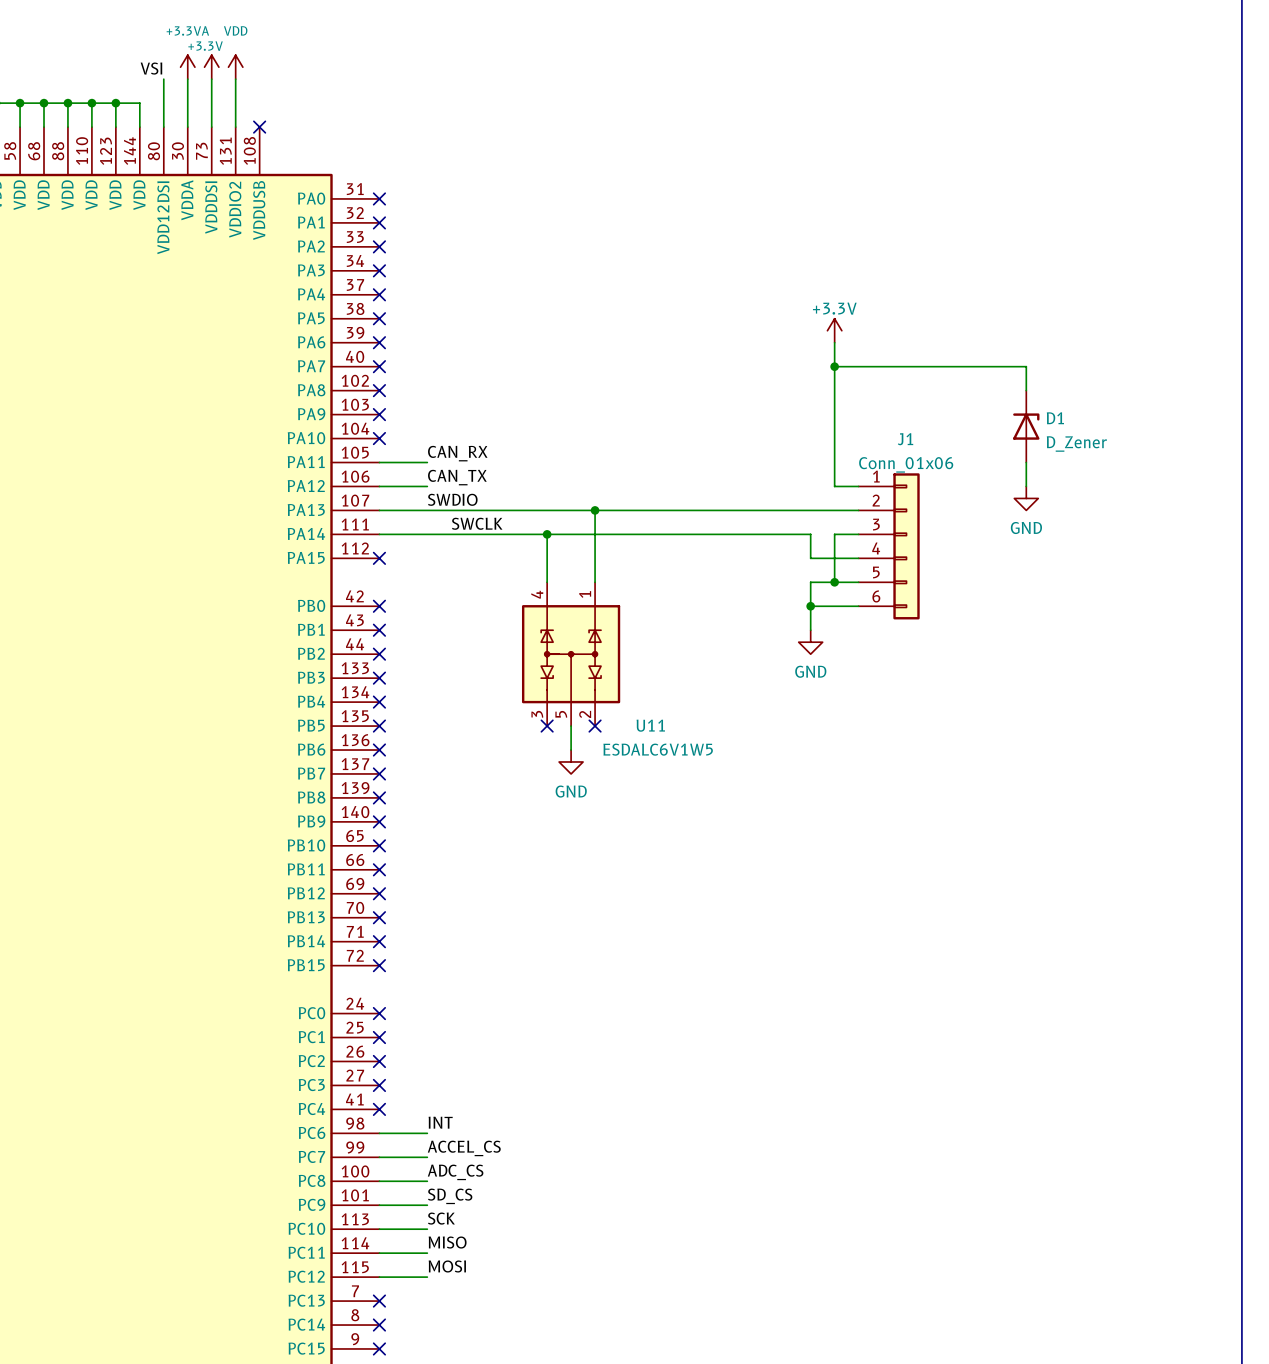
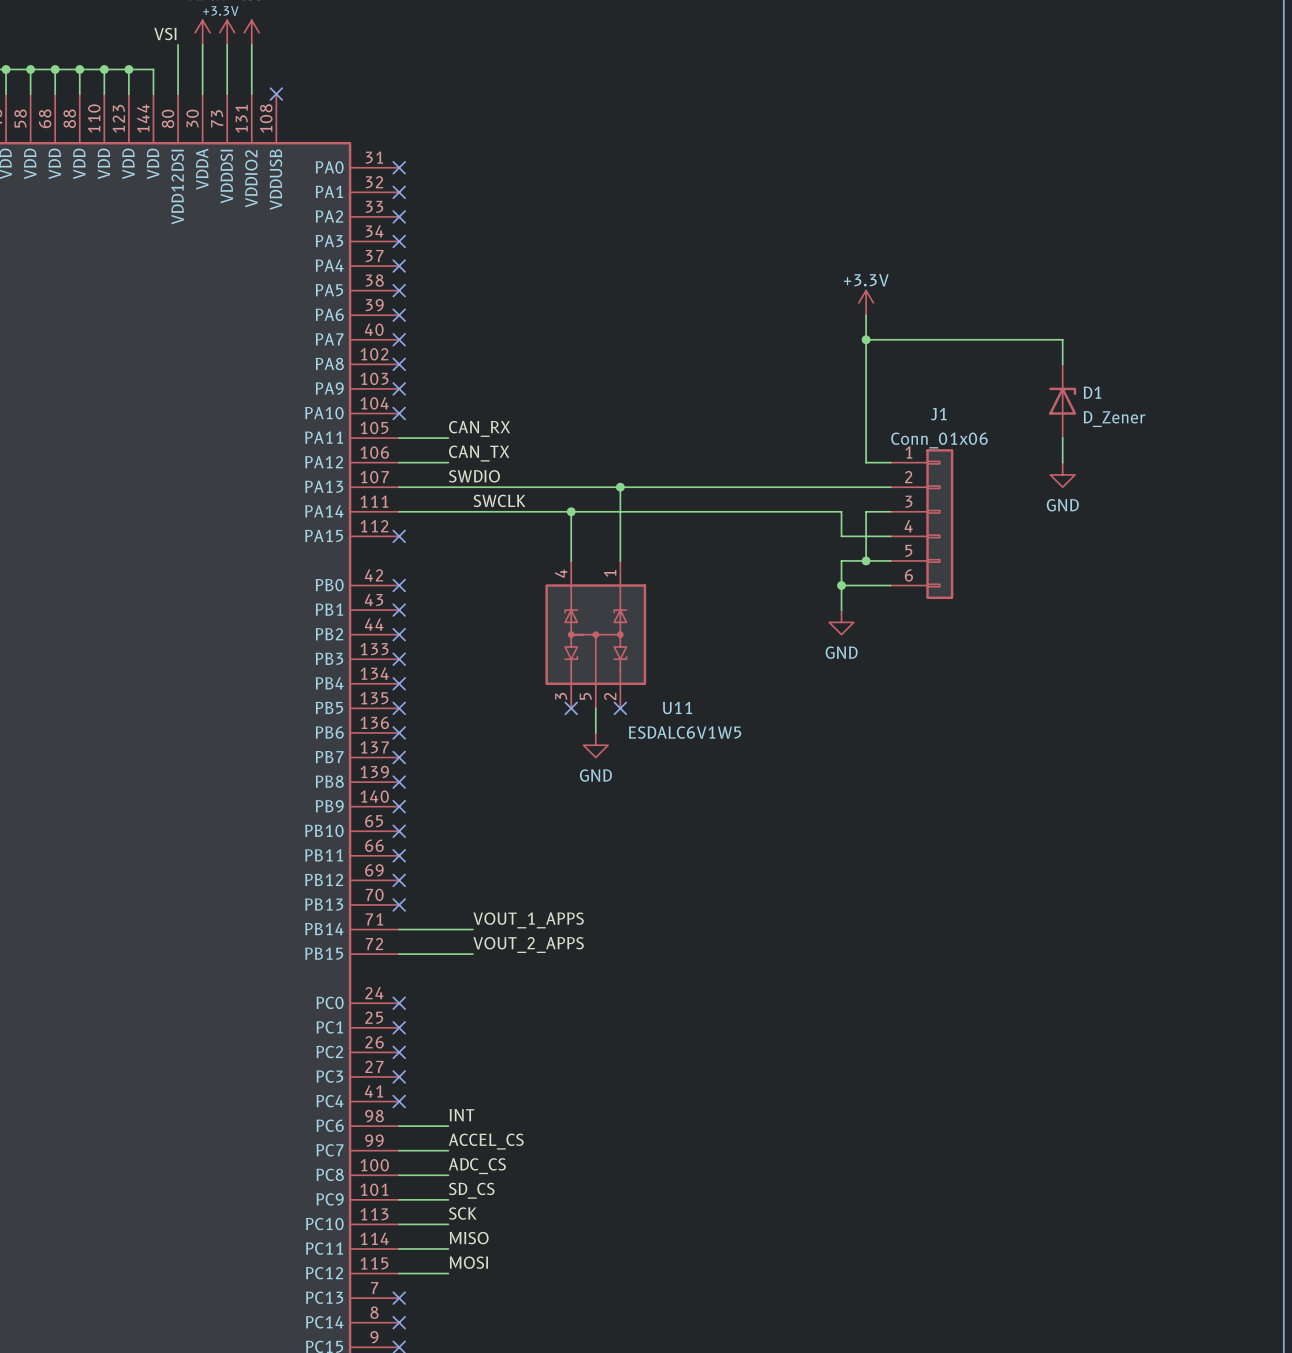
label: none -> VOUT_1_APPS (528, 920)
wire: none -> (399, 929) (472, 929)
no-connect mark: (379, 941) -> none
label: none -> VOUT_2_APPS (528, 944)
wire: none -> (399, 954) (472, 954)
no-connect mark: (379, 965) -> none

